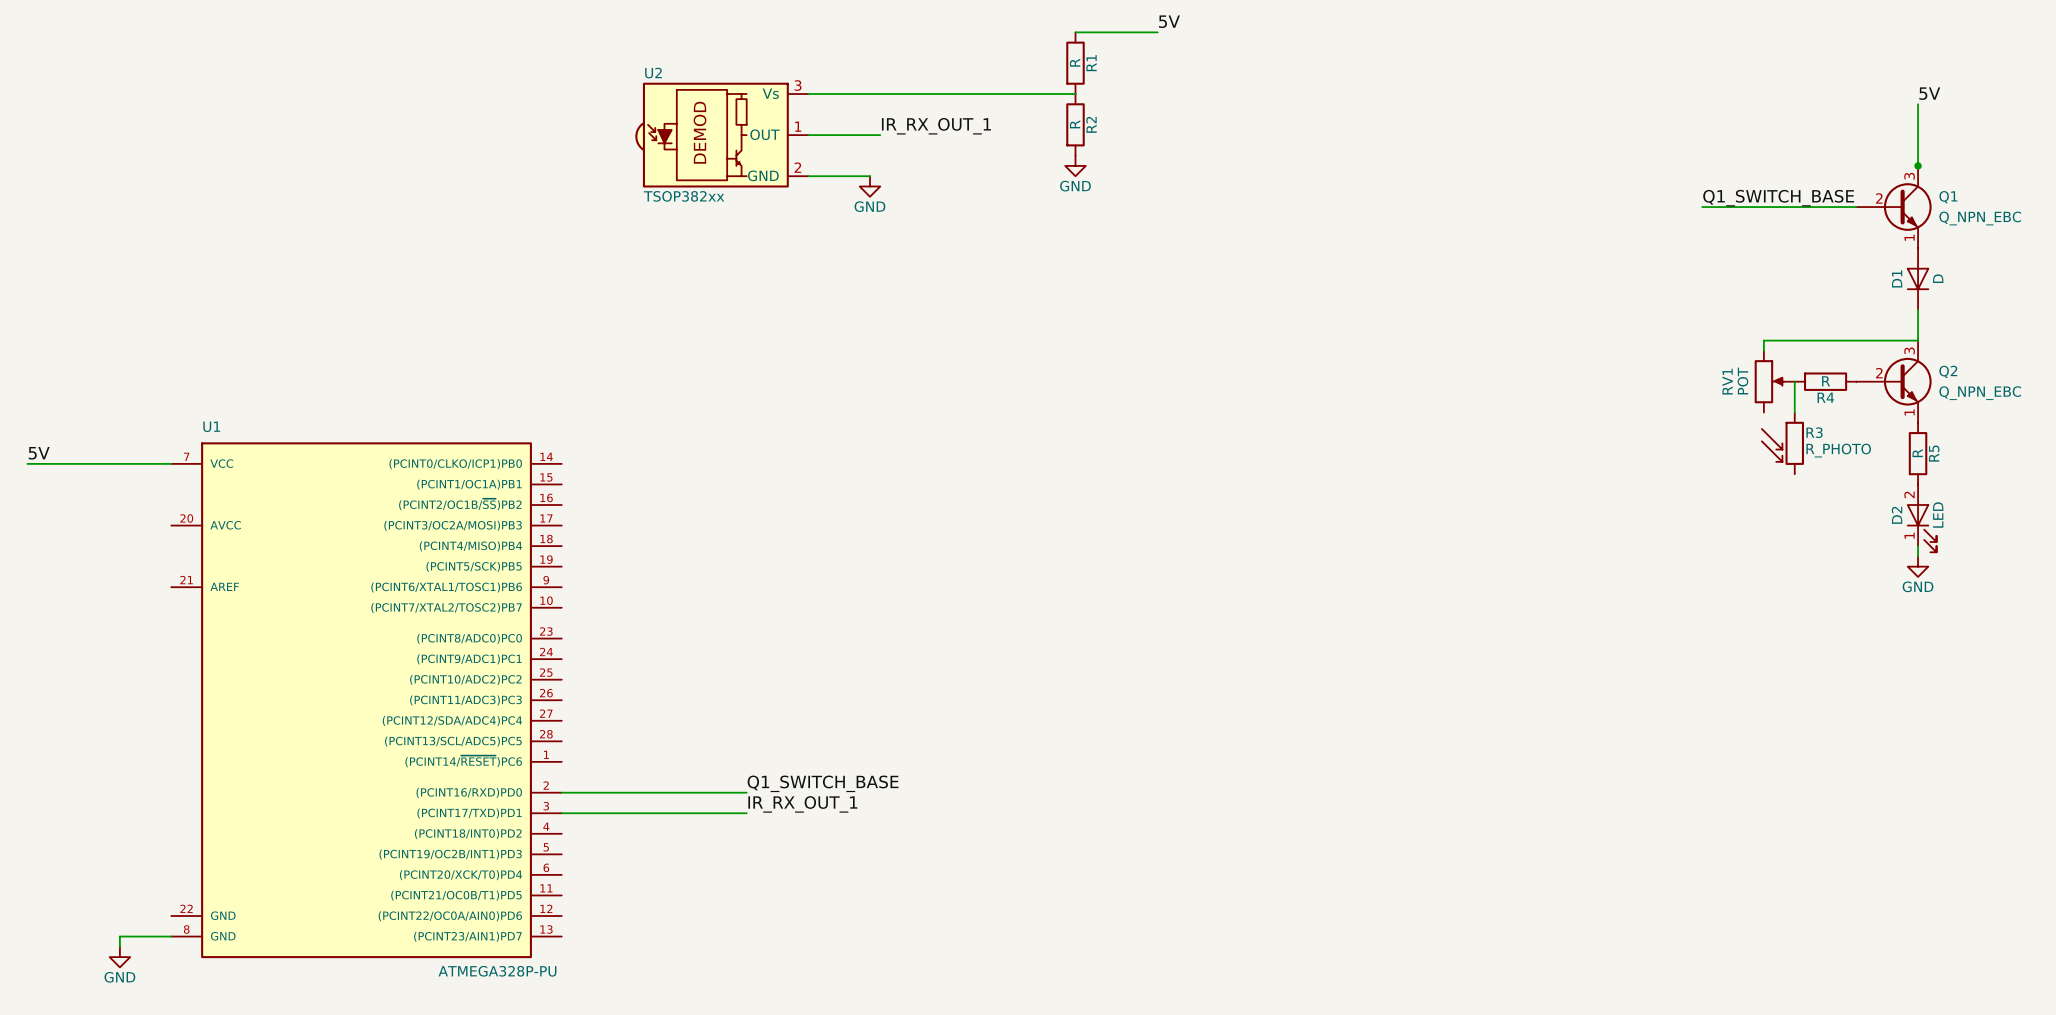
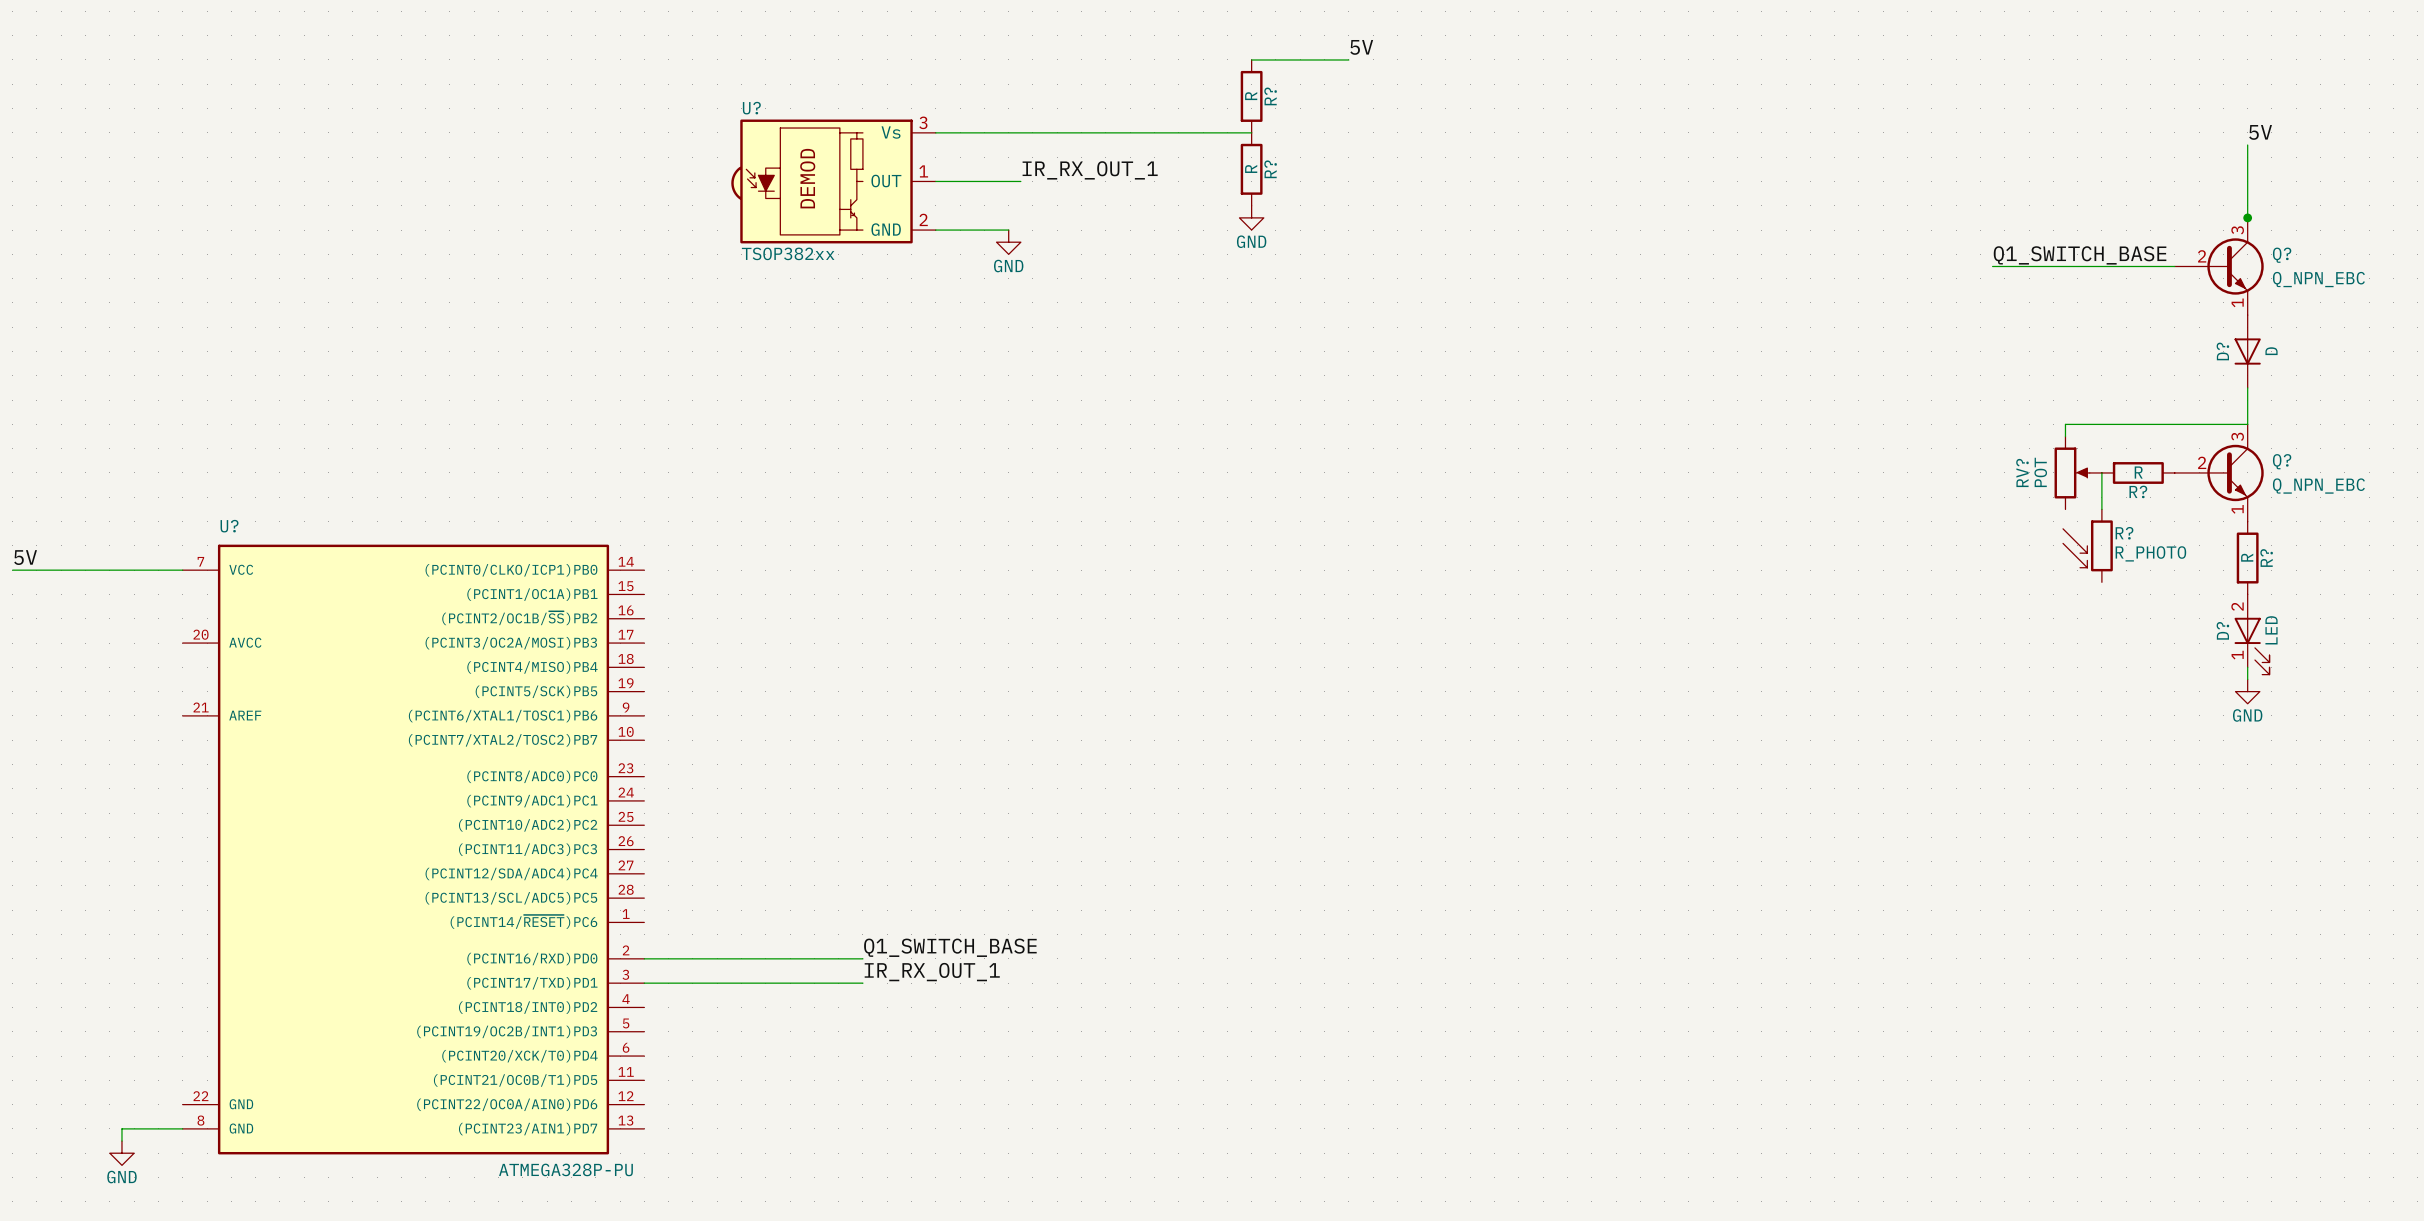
R1 name: R1 (1091, 63) -> R? (1270, 96)
U2 name: U2 (653, 73) -> U? (751, 108)
R2 name: R2 (1091, 124) -> R? (1270, 169)
Q1 name: Q1 (1948, 197) -> Q? (2282, 255)
D1 name: D1 (1897, 278) -> D? (2222, 351)
Q2 name: Q2 (1948, 371) -> Q? (2282, 461)
RV1 name: RV1 (1727, 381) -> RV? (2022, 472)
R4 name: R4 (1825, 397) -> R? (2138, 491)
U1 name: U1 (211, 426) -> U? (229, 526)
R3 name: R3 (1814, 432) -> R? (2124, 533)
R5 name: R5 (1934, 453) -> R? (2266, 558)
D2 name: D2 (1897, 515) -> D? (2222, 630)

